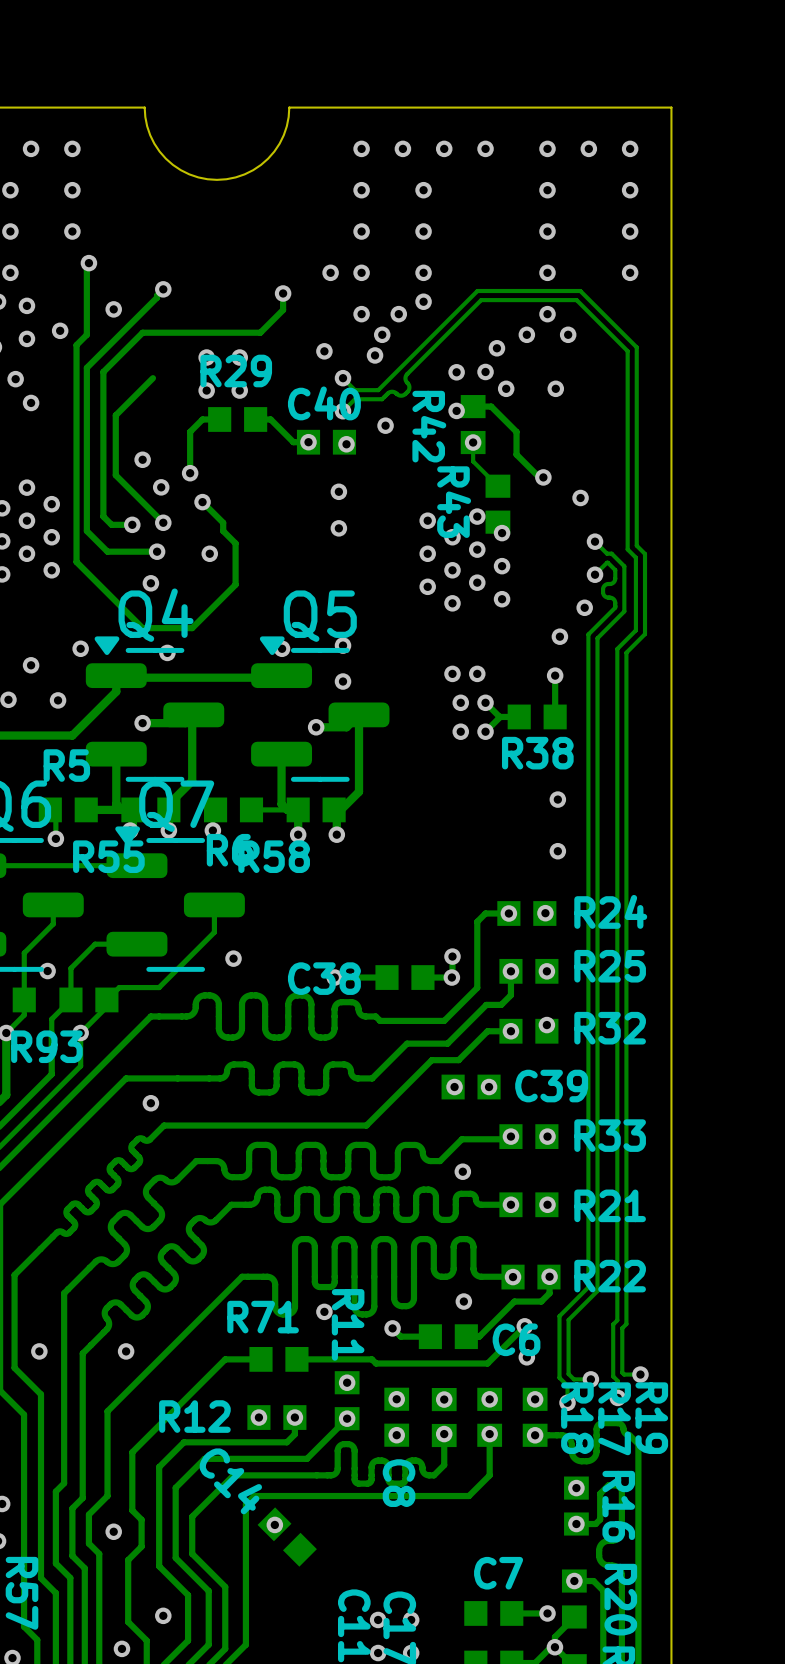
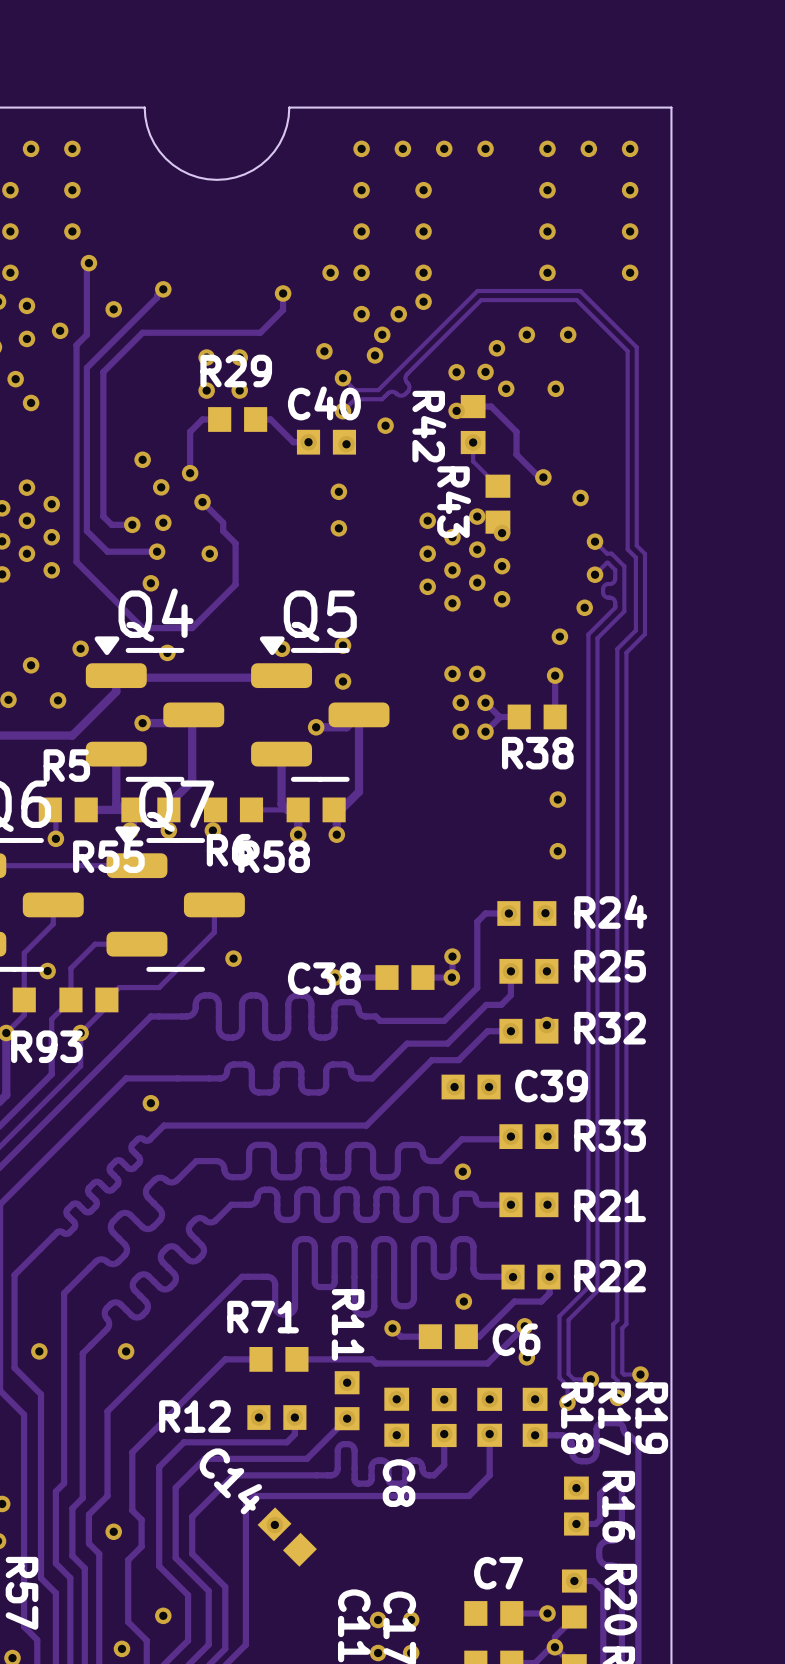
via: (547, 314) -> none
track: (152, 378) (115, 415) (115, 475) (163, 522) -> none
via: (324, 1311) -> none

